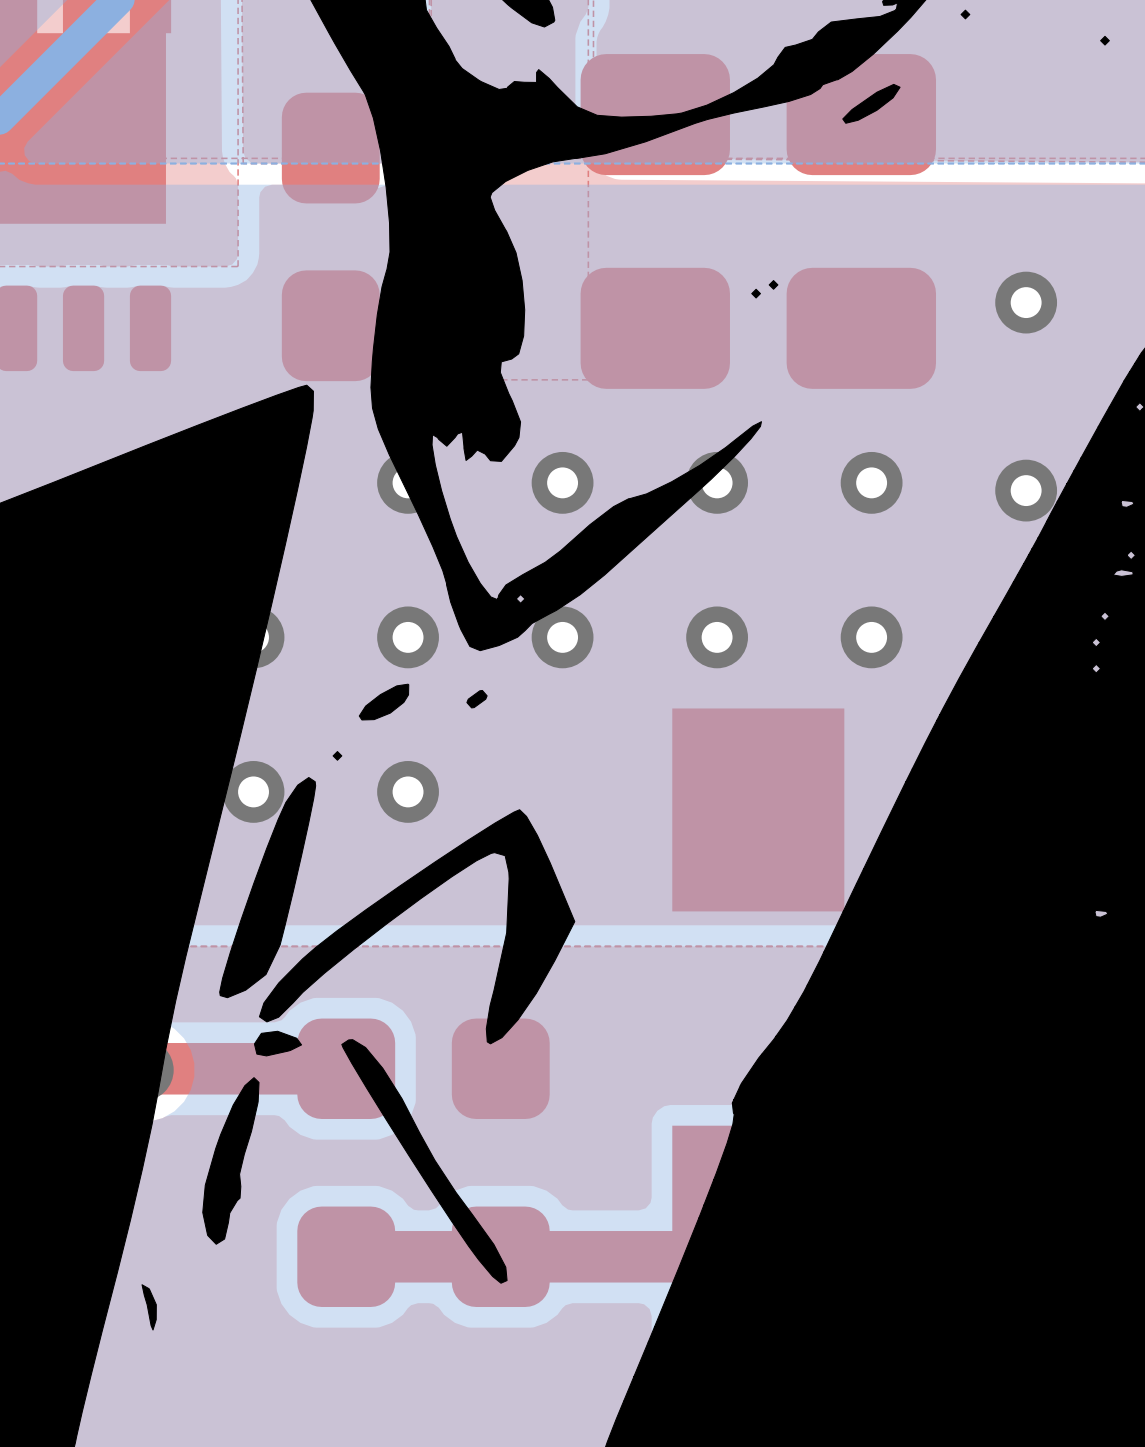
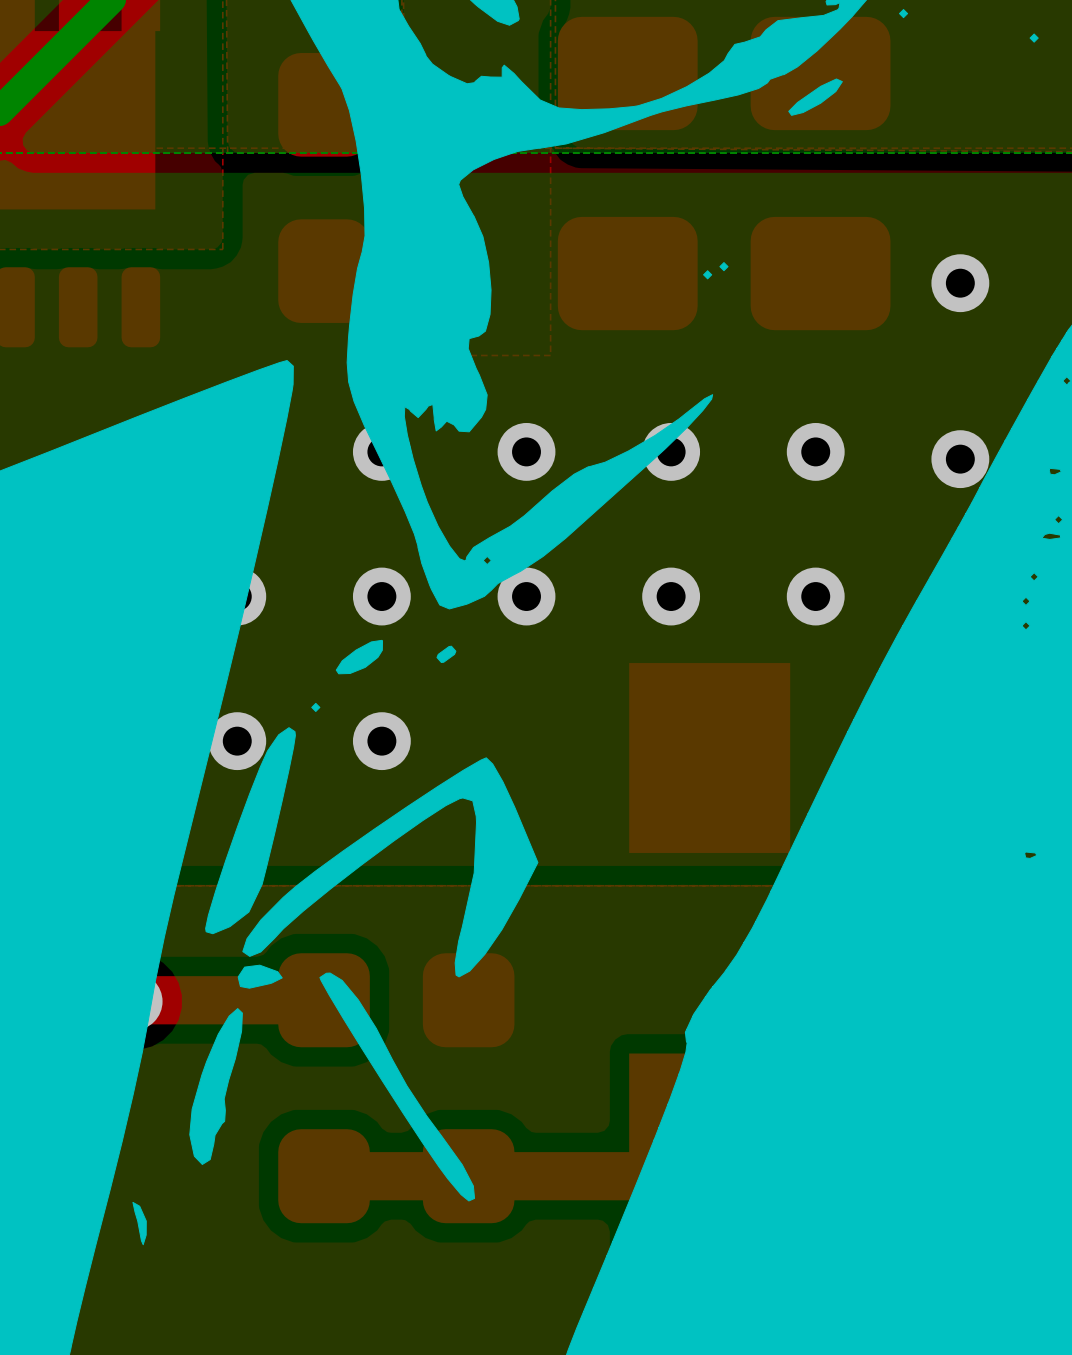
part position: (655, 221) -> (627, 173)
part position: (861, 221) -> (820, 173)
part position: (330, 236) -> (324, 187)

